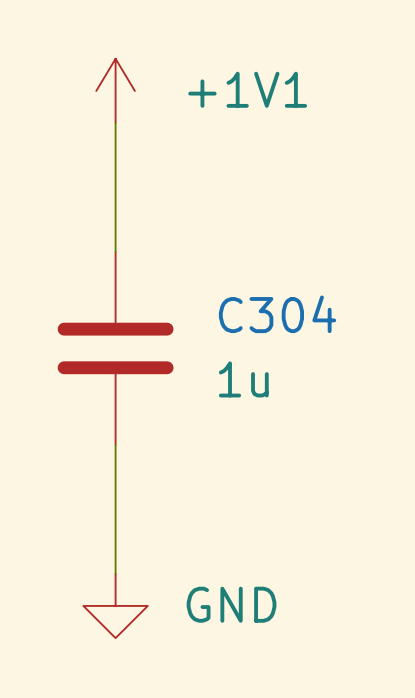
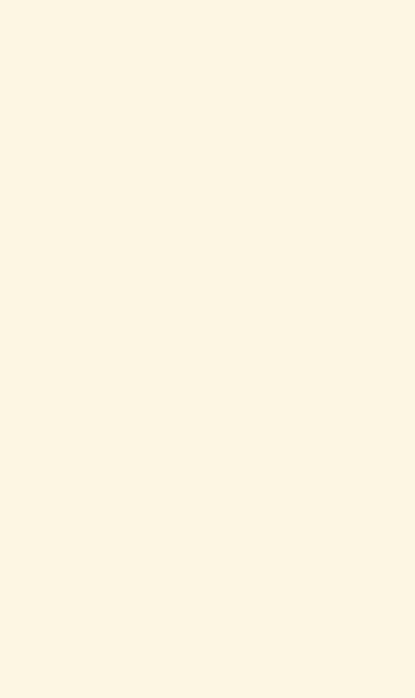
power symbol: +1V1 (115, 90) -> none
wire: (115, 123) (115, 251) -> none
C304: 1u (115, 348) -> none
wire: (115, 445) (115, 573) -> none
power symbol: GND (115, 605) -> none

